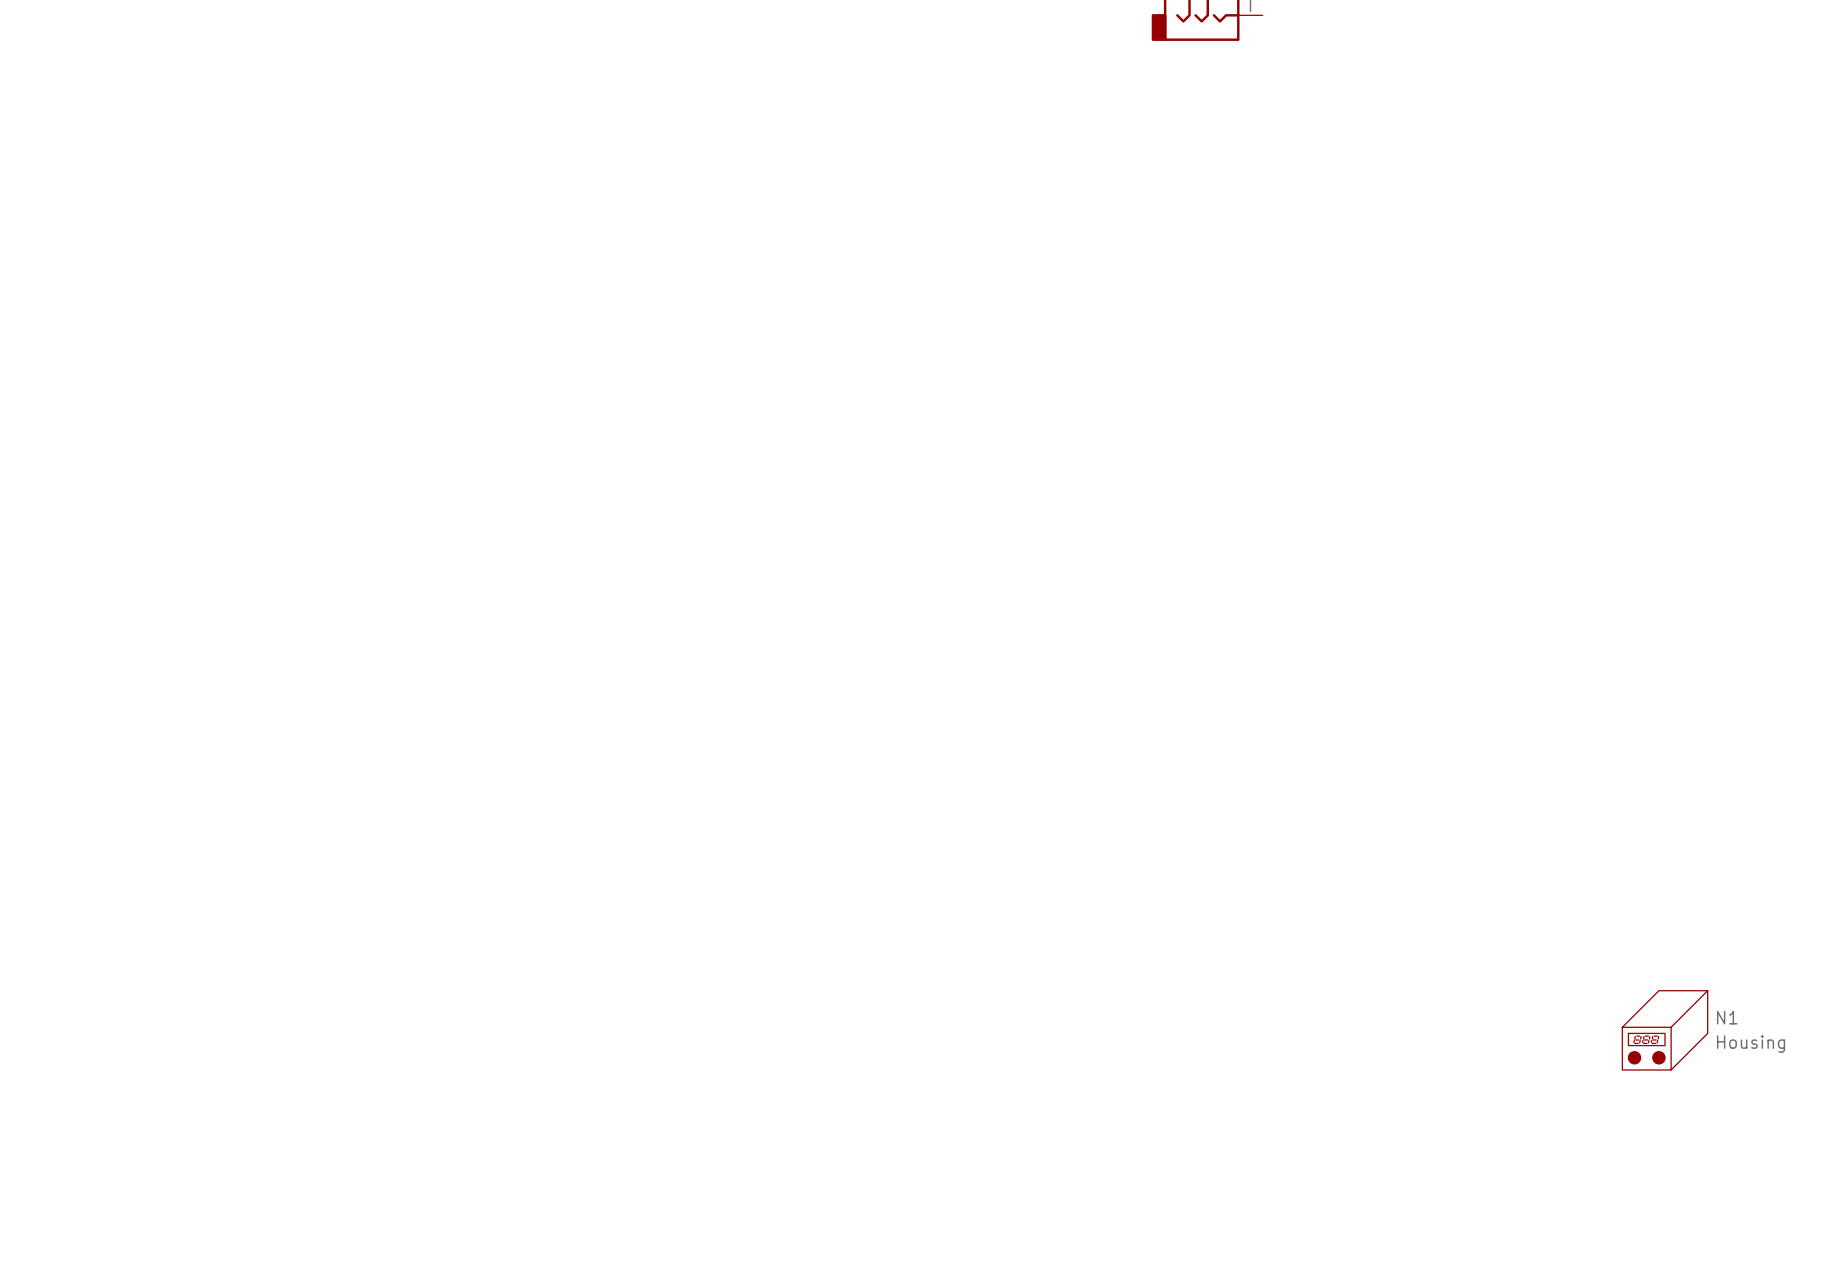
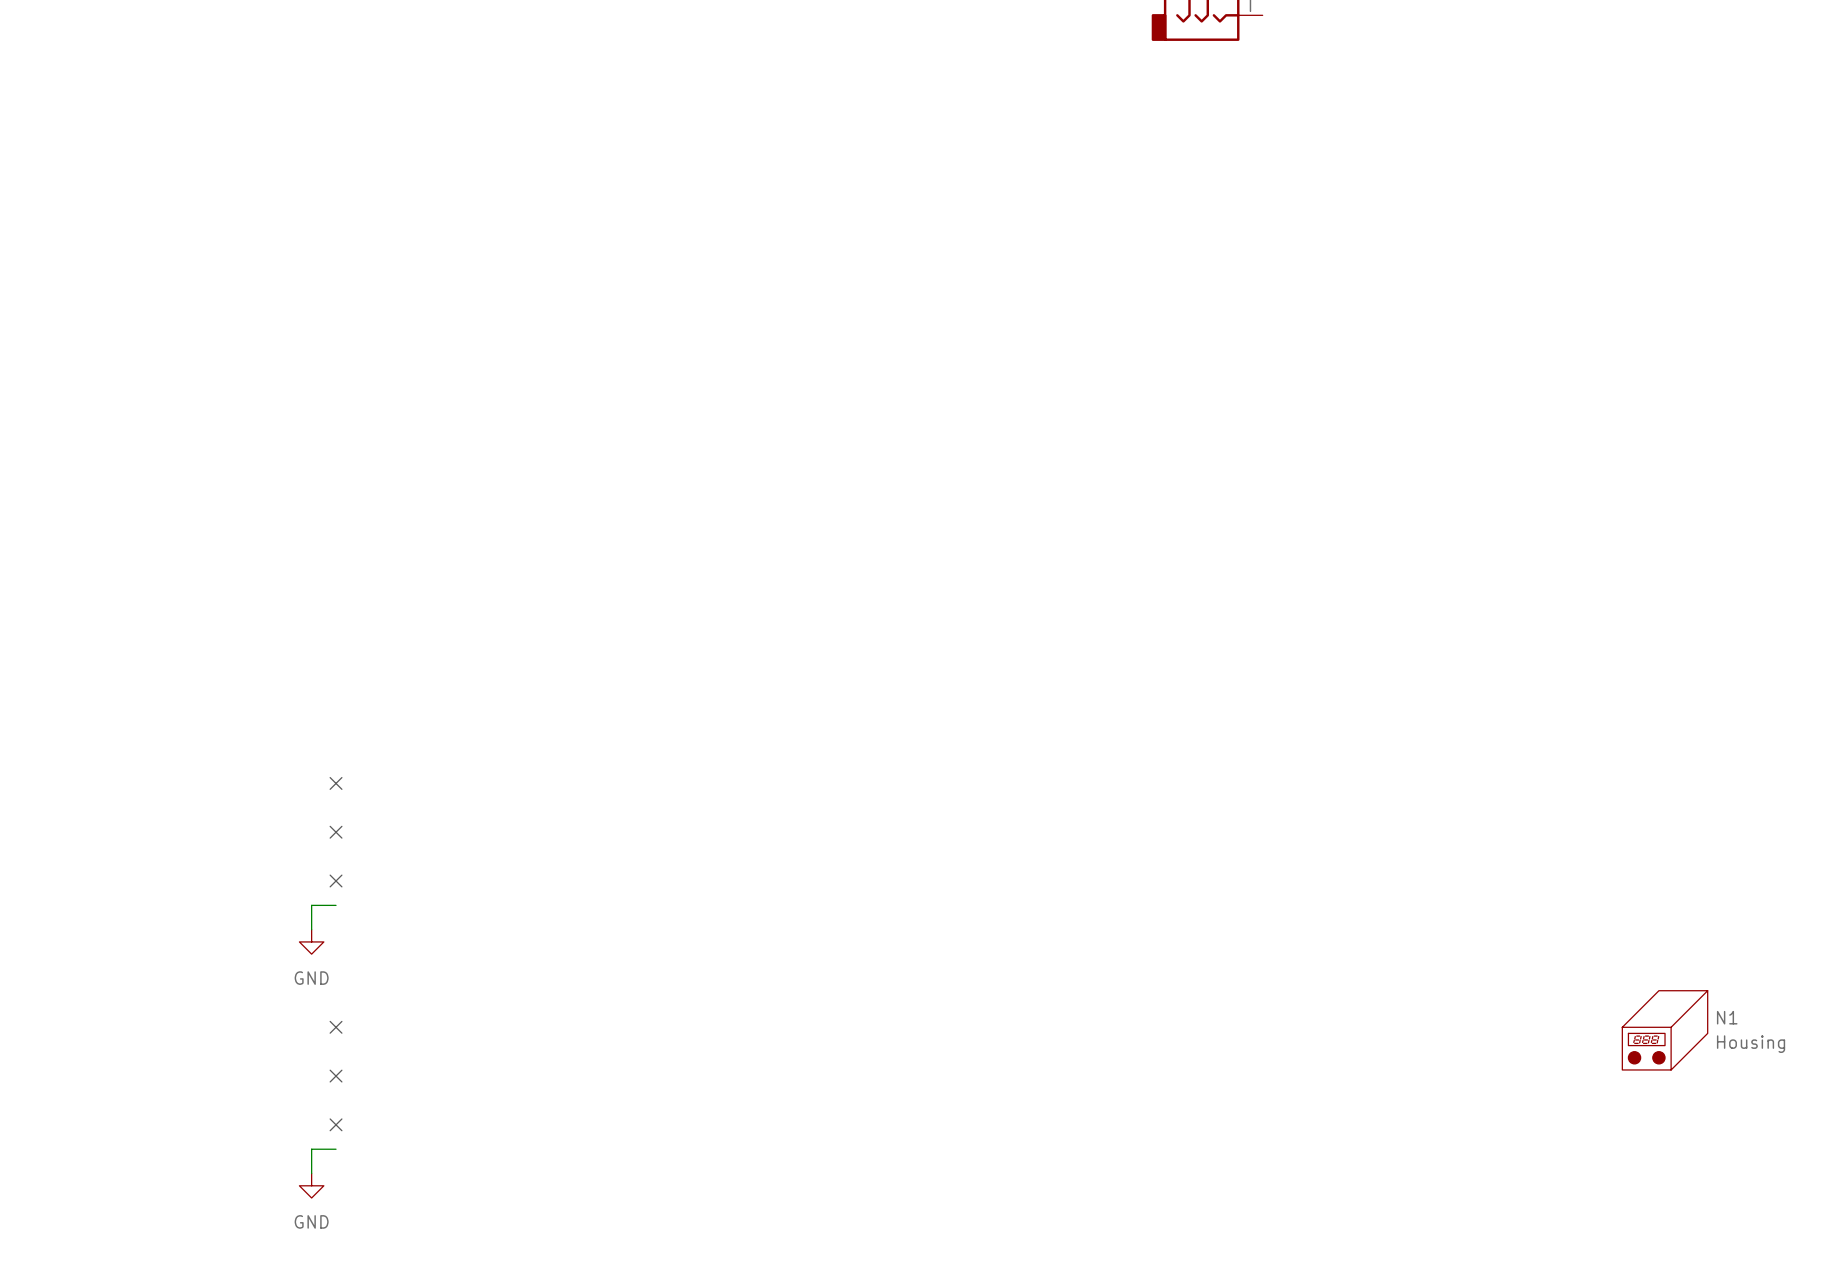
no-connect mark: none -> (336, 783)
no-connect mark: none -> (336, 832)
no-connect mark: none -> (336, 880)
wire: none -> (336, 905) (311, 905) (311, 929)
power symbol: none -> GND (311, 941)
no-connect mark: none -> (336, 1027)
no-connect mark: none -> (336, 1076)
no-connect mark: none -> (336, 1124)
wire: none -> (336, 1149) (311, 1149) (311, 1173)
power symbol: none -> GND (311, 1185)

